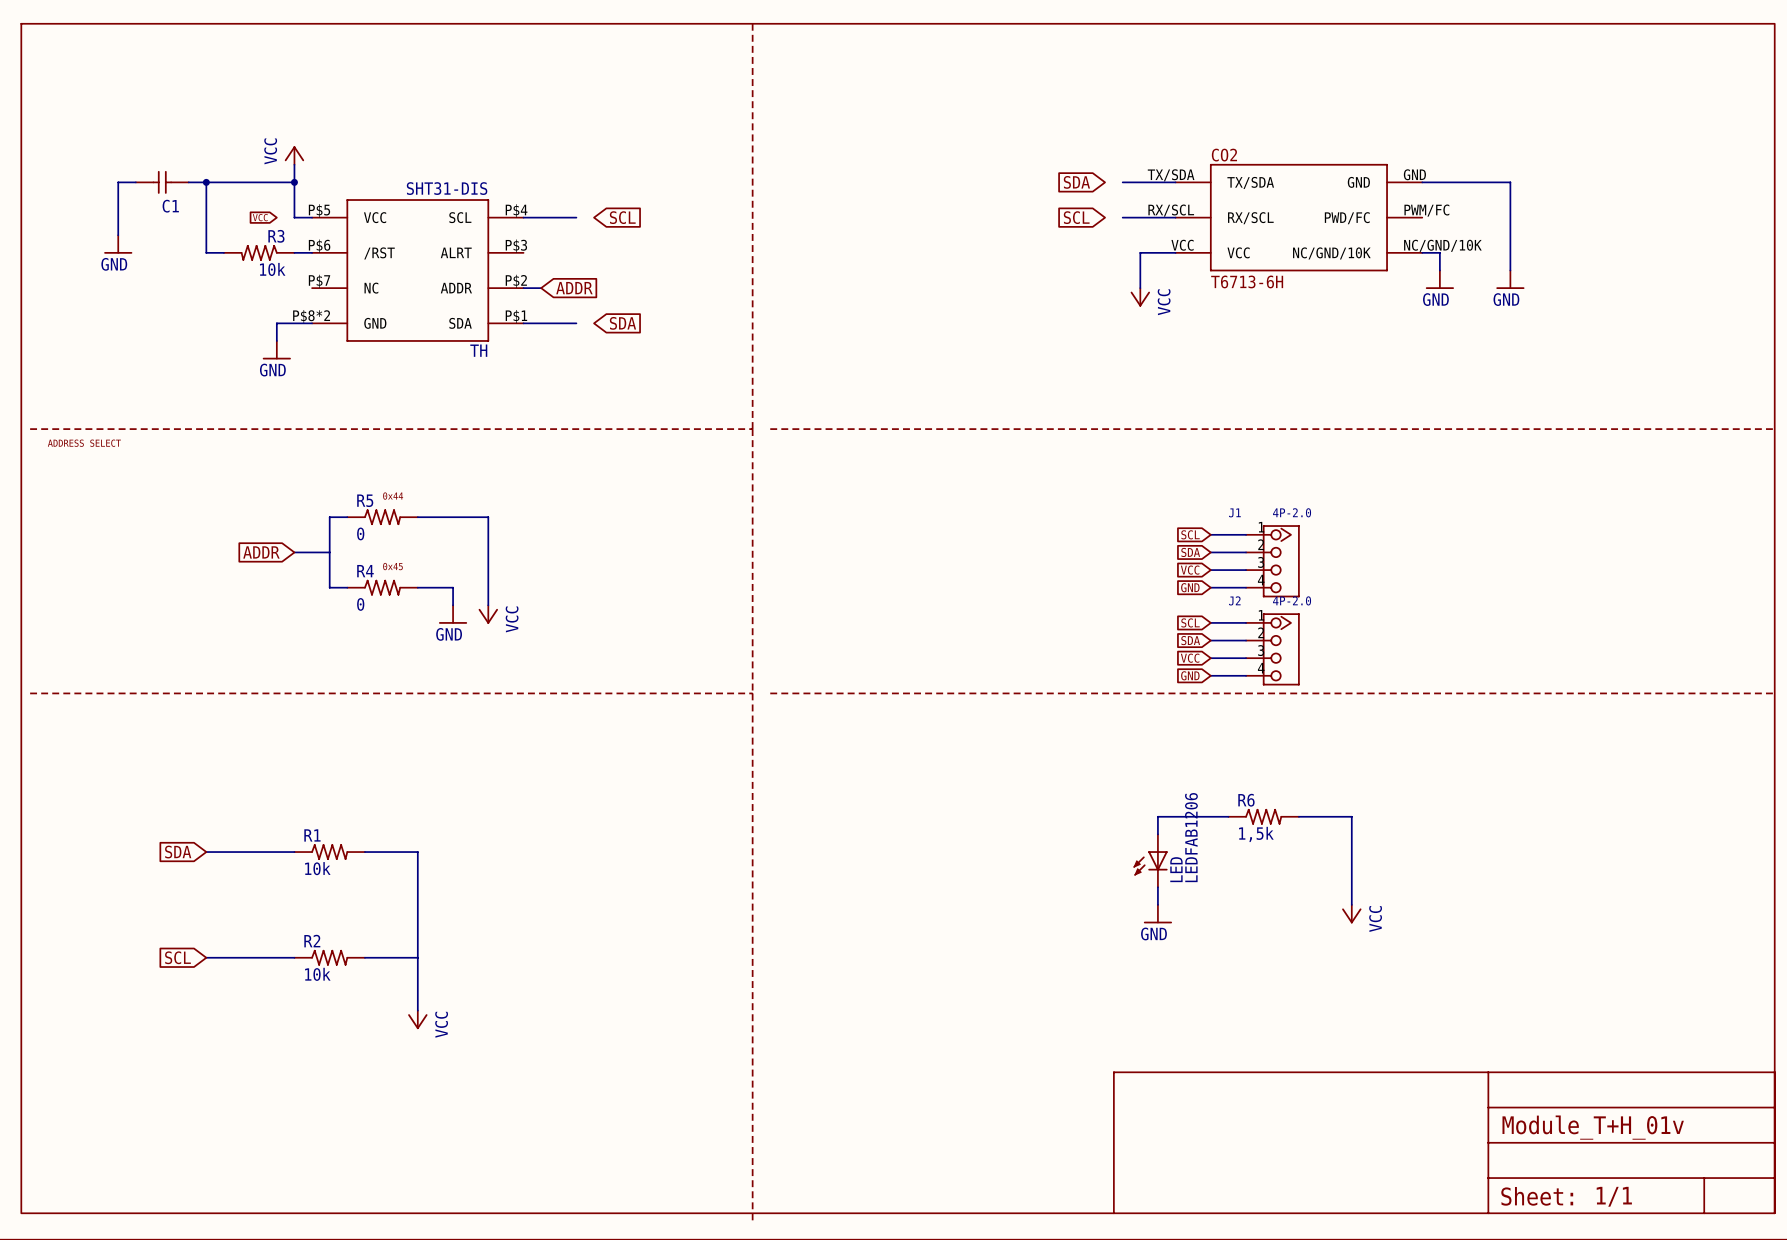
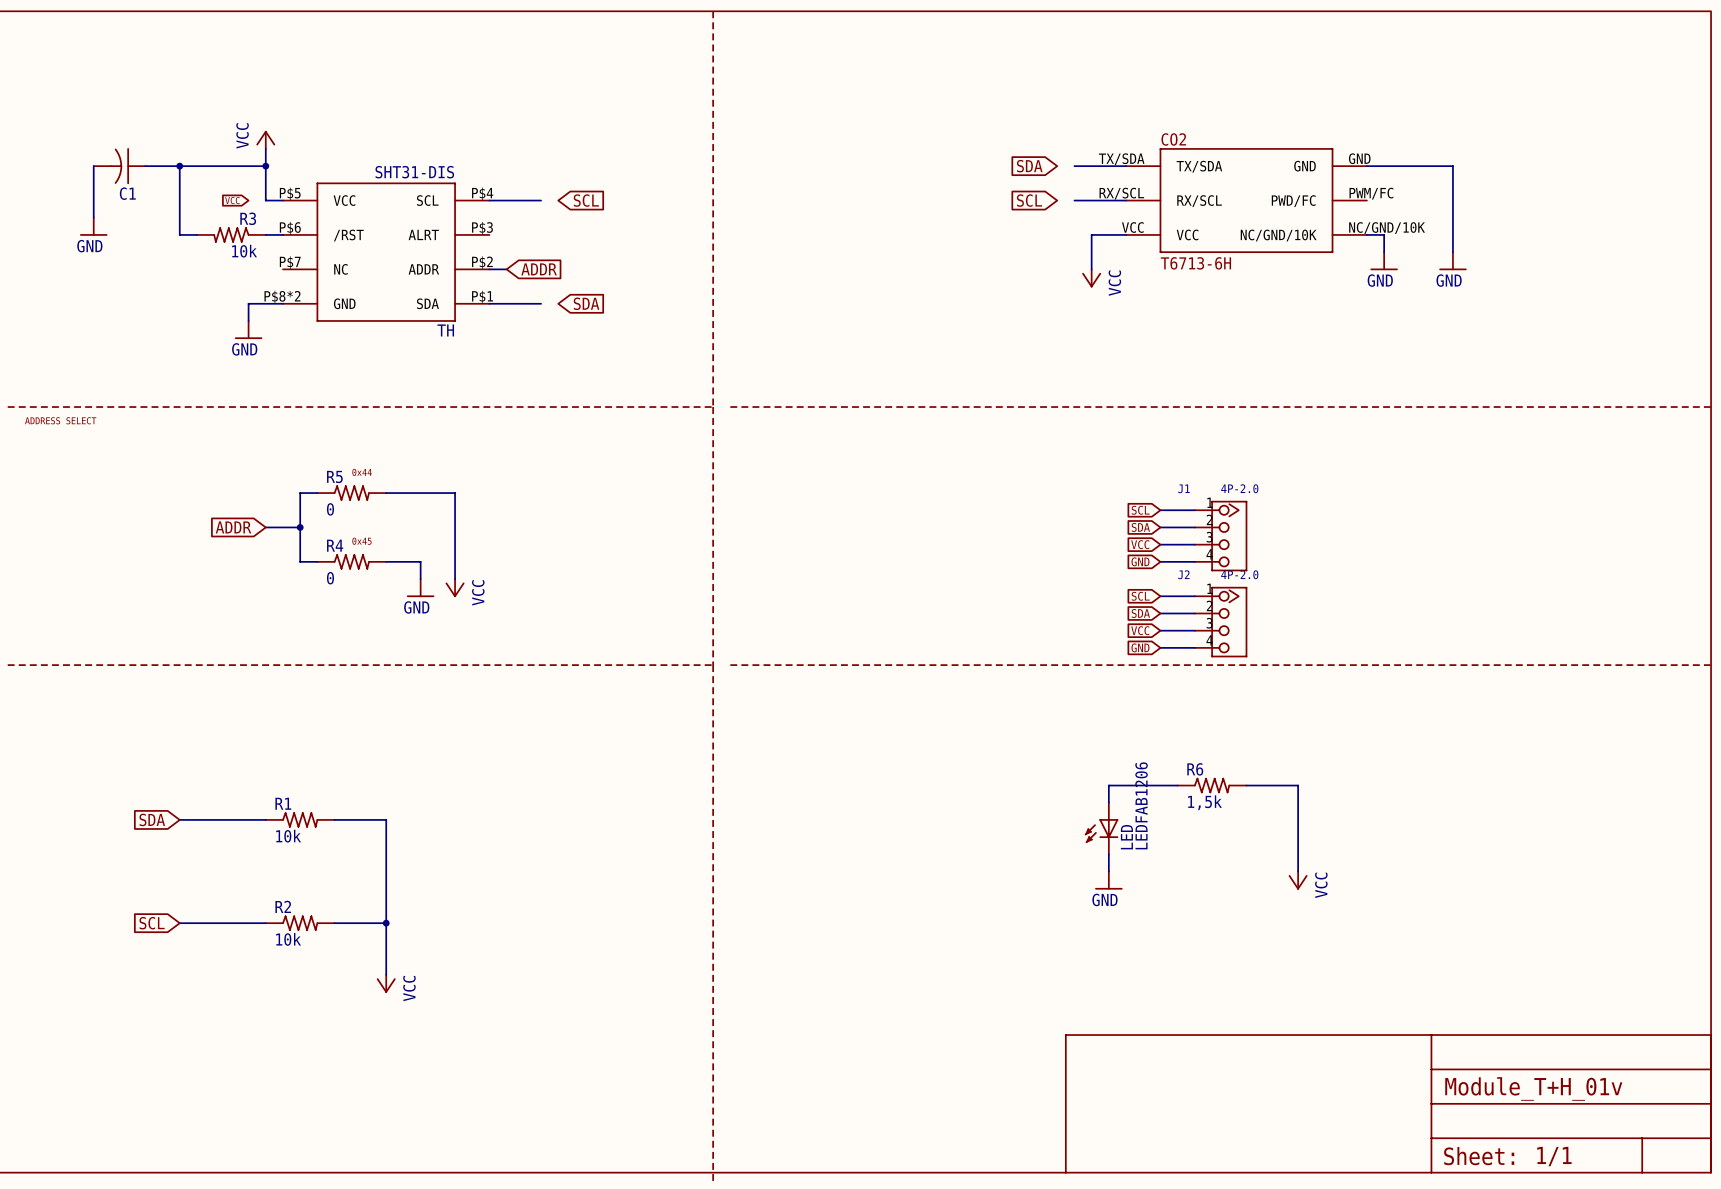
C1 symbol: [135, 170, 189, 194] -> [93, 148, 146, 185]
junction: none -> (300, 527)
junction: none -> (386, 923)

